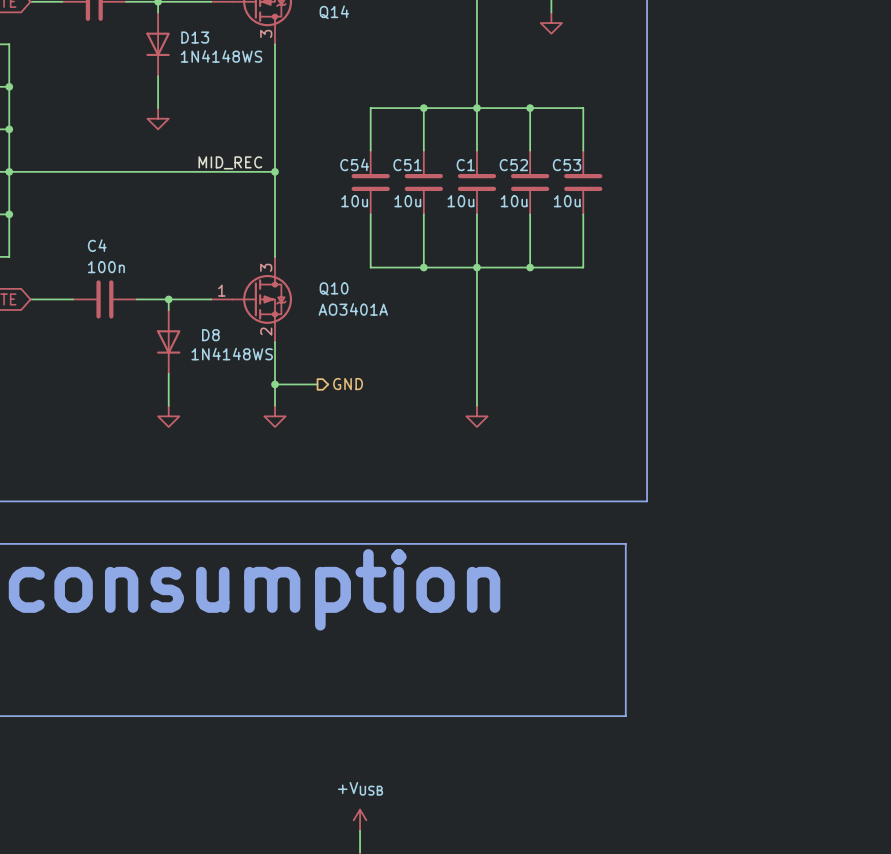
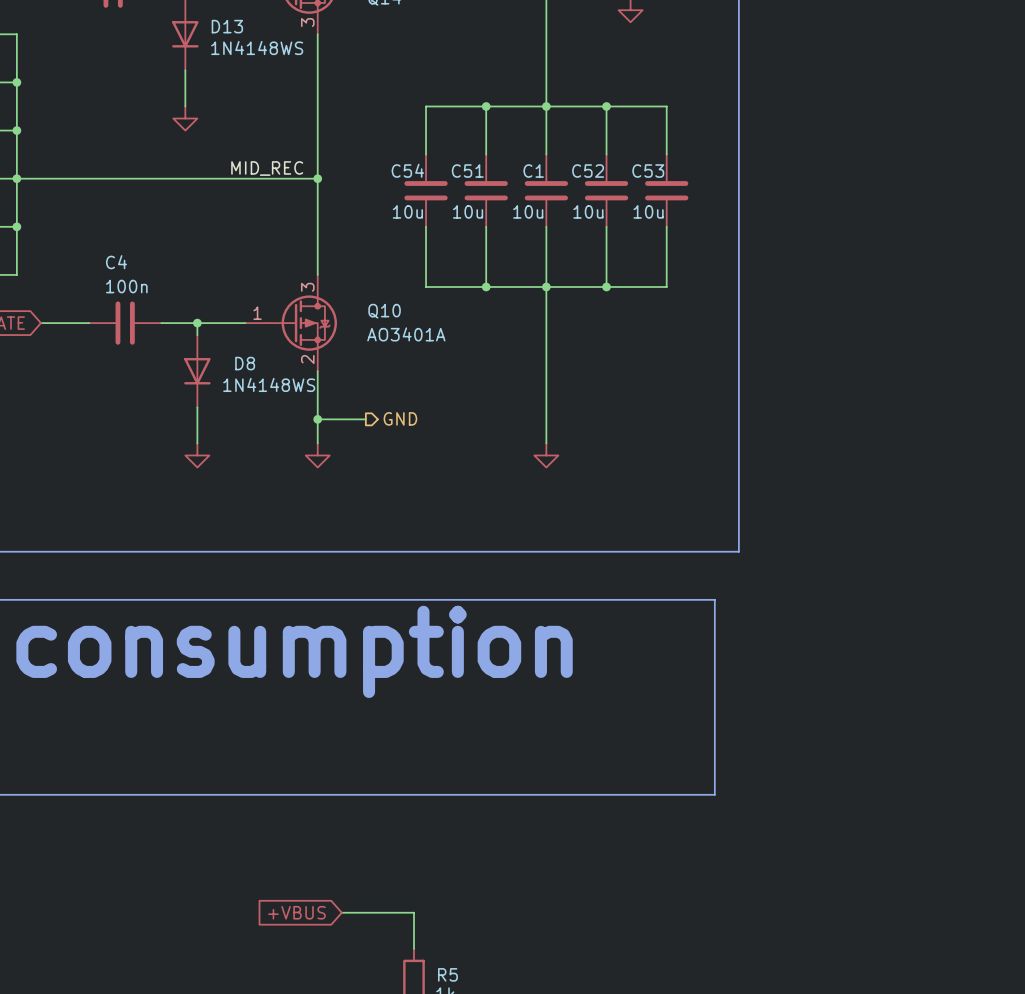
global label: none -> +VBUS (296, 912)
wire: none -> (341, 912) (413, 912) (413, 924)
power symbol: +VUSB (360, 820) -> none

